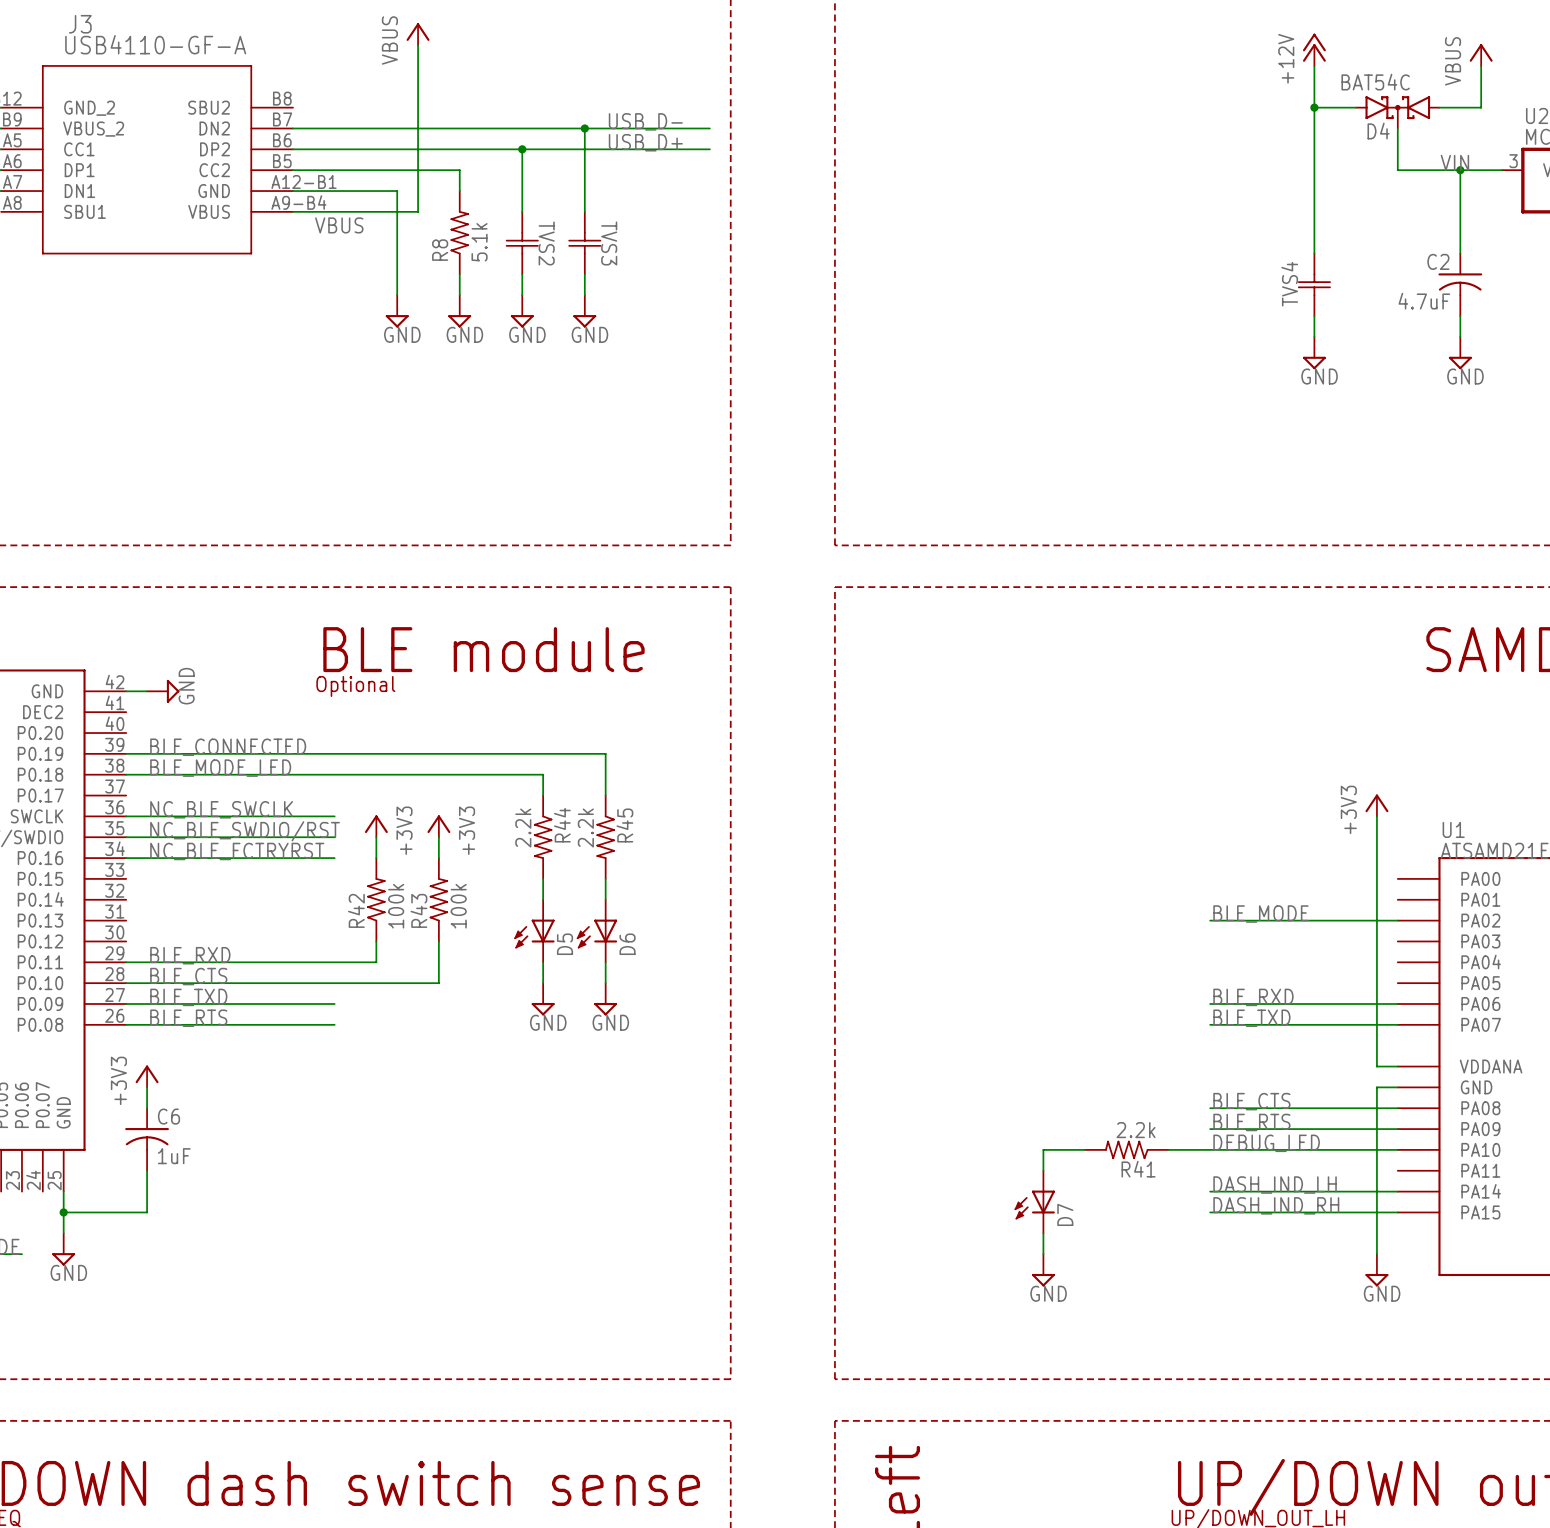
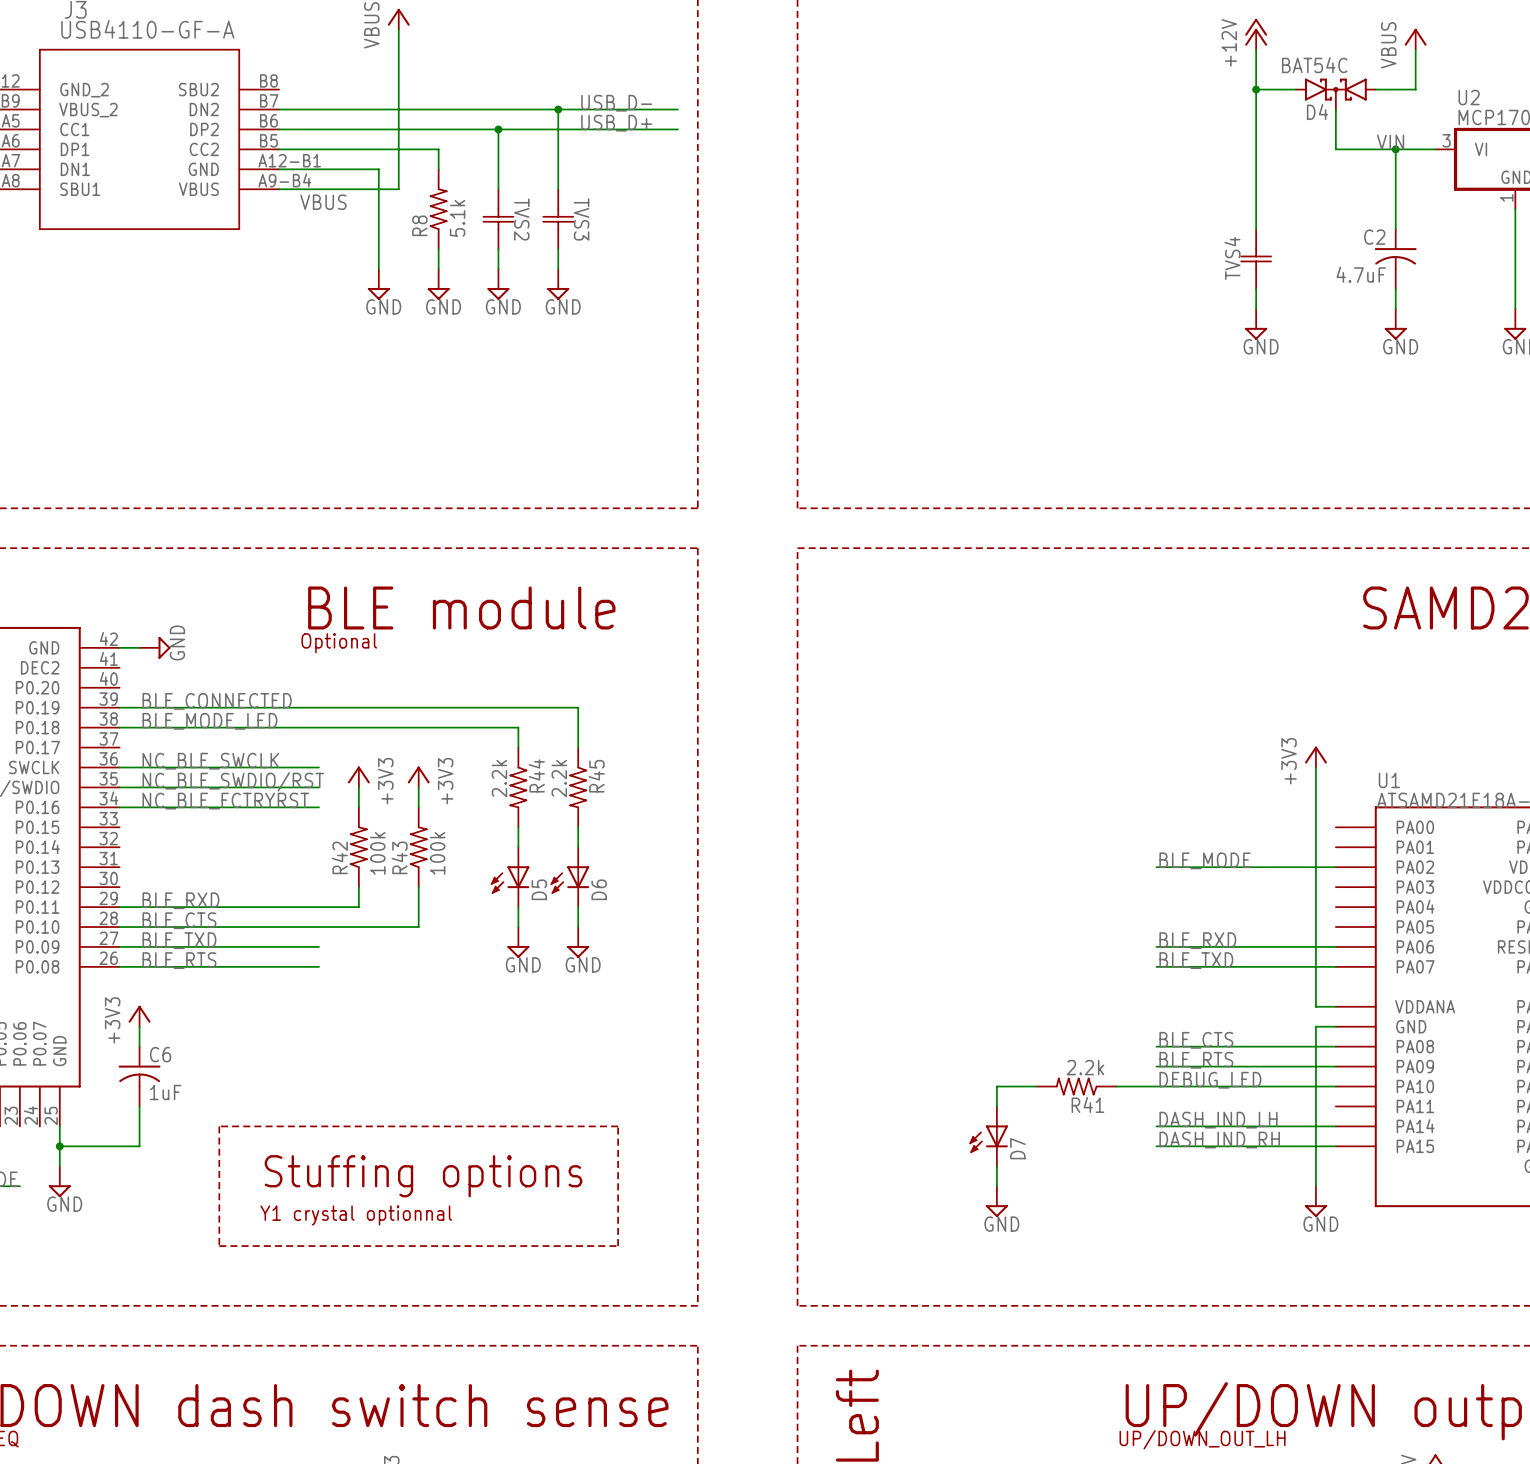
line: none -> (219, 1126) (219, 1246) (618, 1246) (618, 1126) (219, 1126)
text: none -> Stuffing options (423, 1176)
text: none -> Y1 crystal optionnal (356, 1215)

